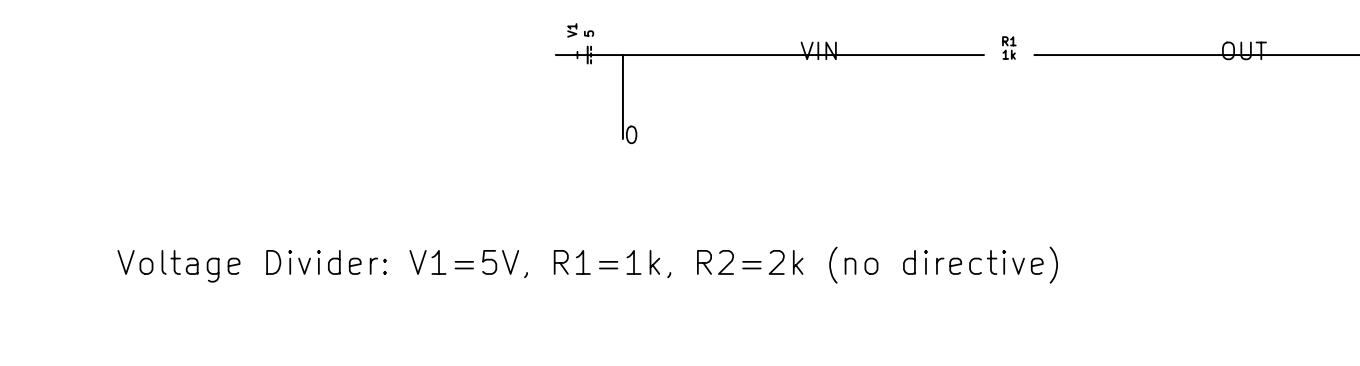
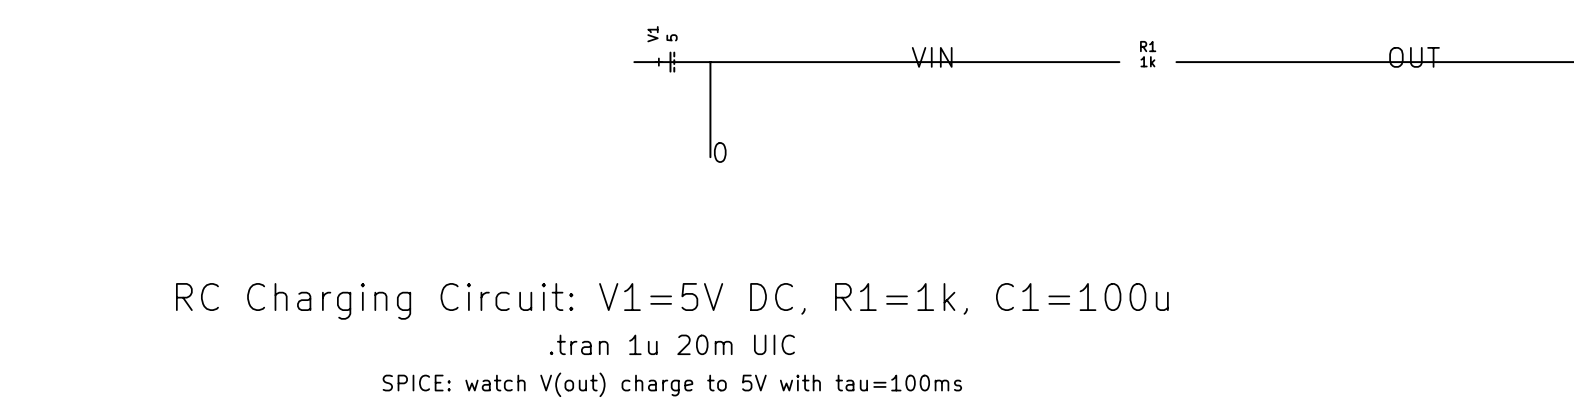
text: Voltage Divider: V1=5V, R1=1k, R2=2k (no directive) (587, 265) -> RC Charging Circuit: V1=5V DC, R1=1k, C1=100u (672, 301)
text: none -> .tran 1u 20m UIC (672, 344)
text: none -> SPICE: watch V(out) charge to 5V with tau=100ms (672, 384)

